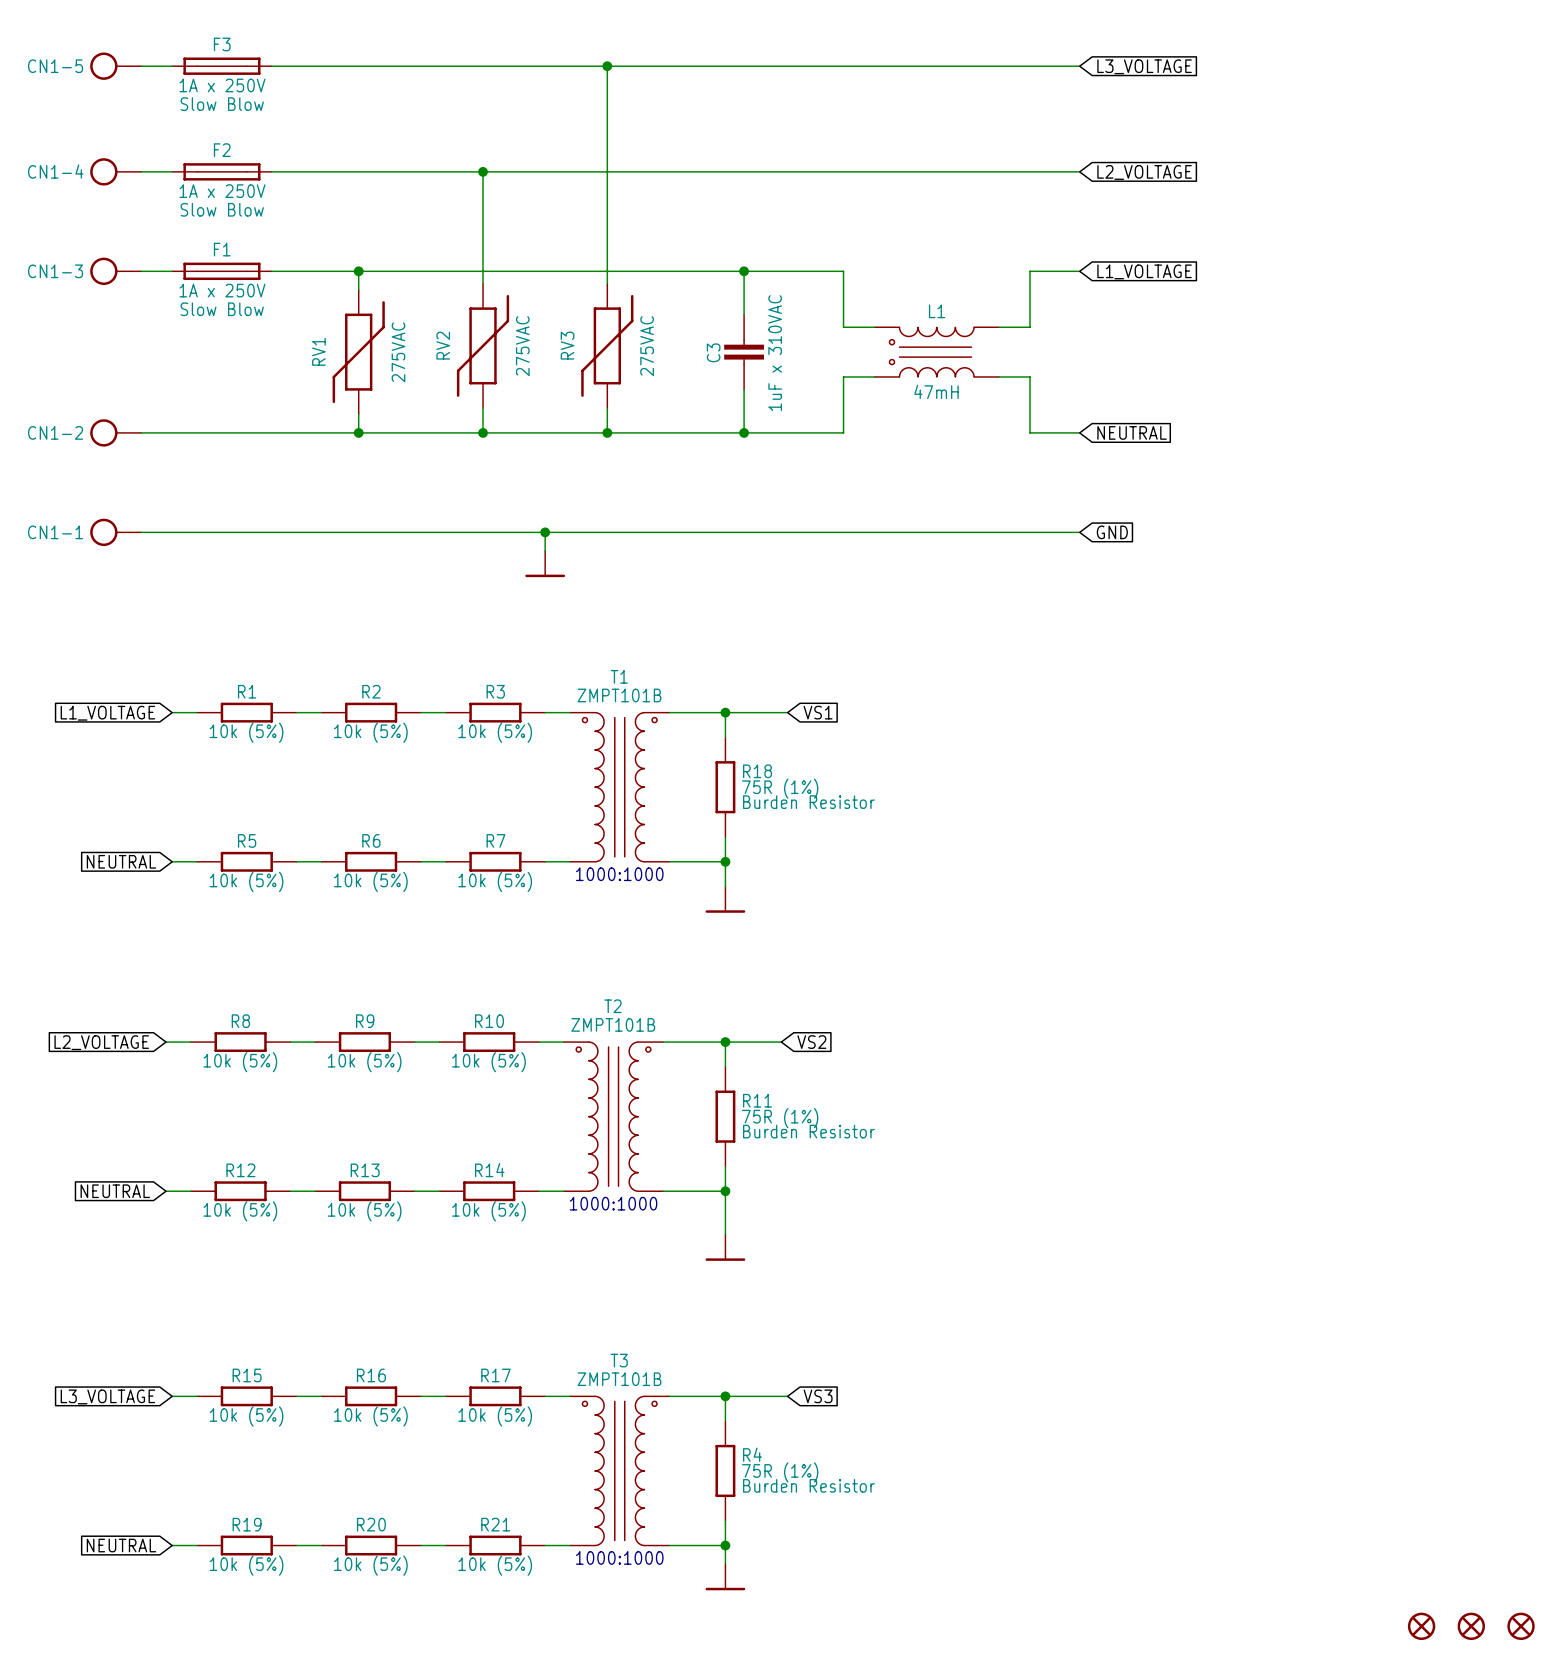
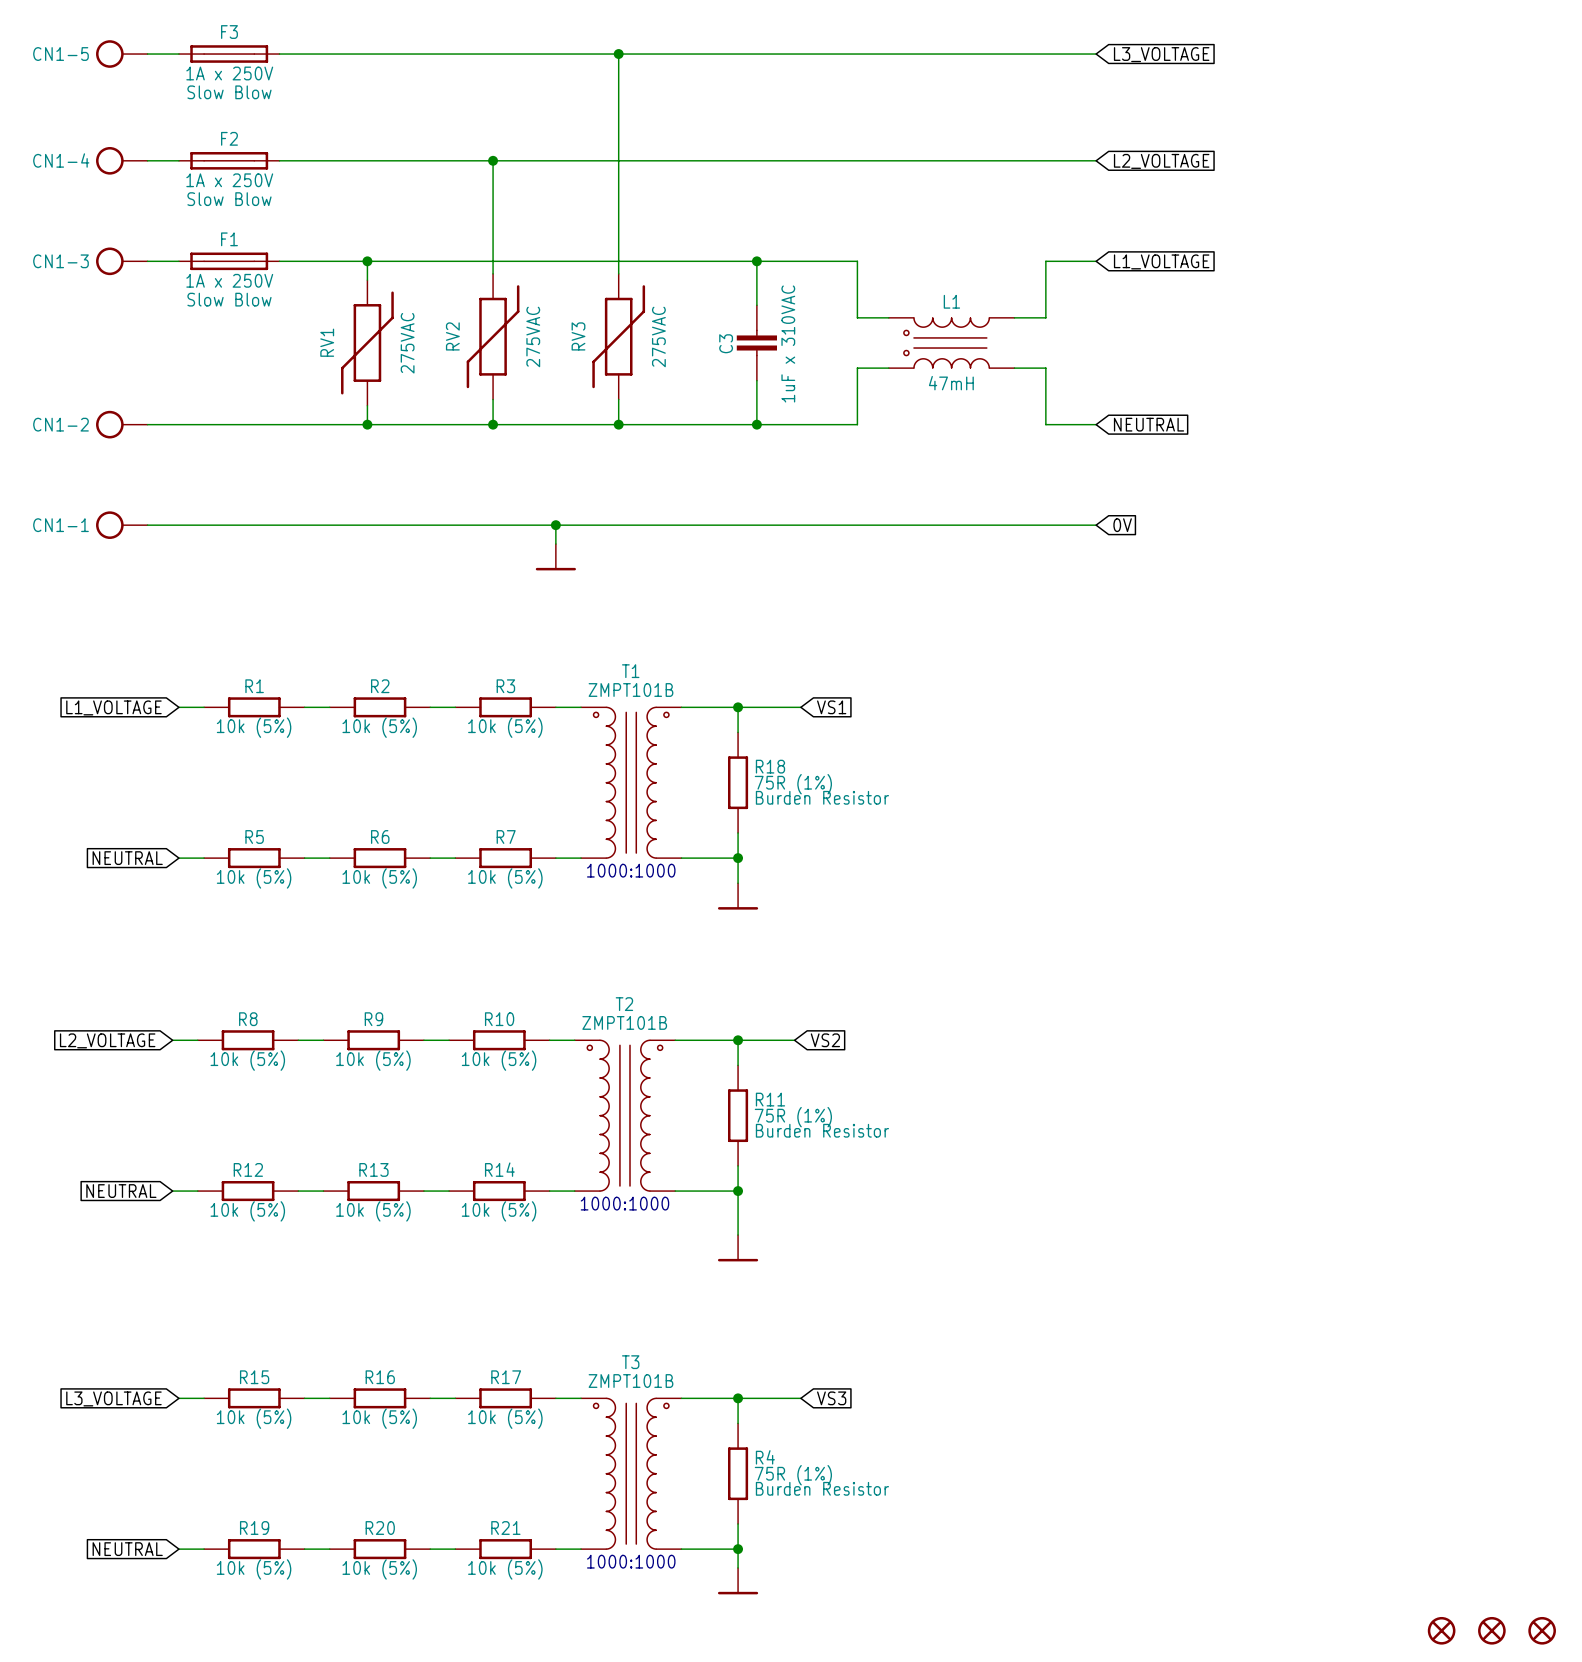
global label: GND (1112, 532) -> 0V (1122, 525)

